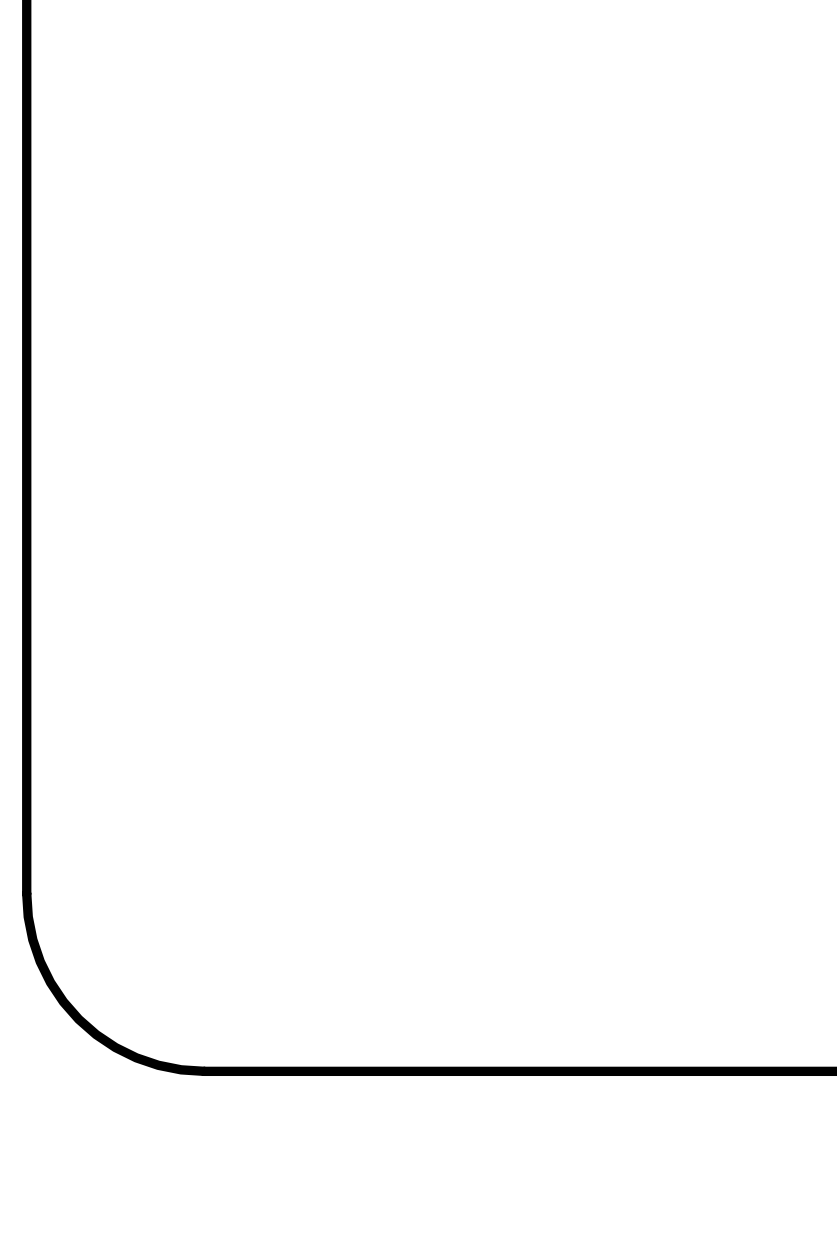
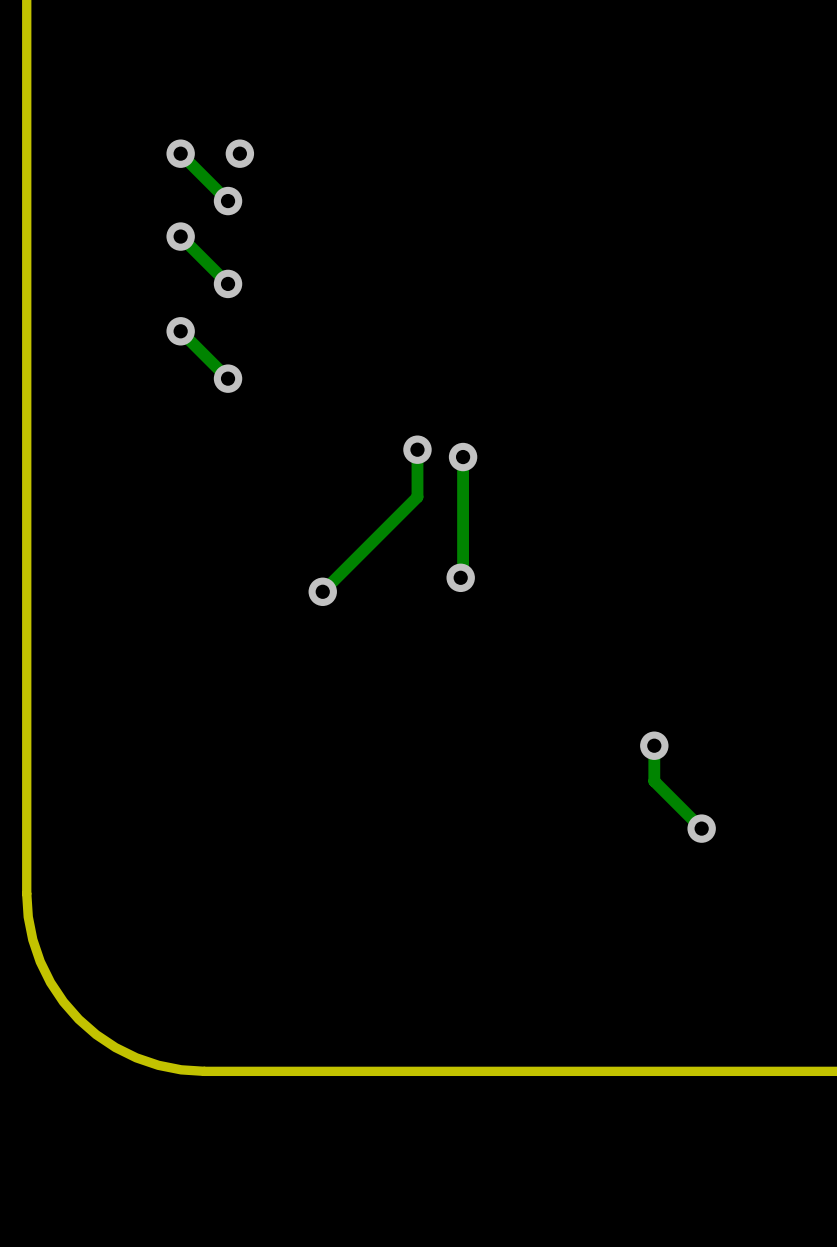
track: none -> (180, 153) (228, 201)
via: none -> (180, 153)
via: none -> (239, 153)
via: none -> (228, 201)
track: none -> (180, 236) (228, 283)
via: none -> (180, 236)
via: none -> (228, 283)
track: none -> (180, 331) (228, 378)
via: none -> (180, 331)
via: none -> (228, 378)
track: none -> (417, 449) (417, 497) (322, 591)
via: none -> (417, 449)
track: none -> (463, 457) (463, 575) (460, 577)
via: none -> (463, 457)
via: none -> (460, 577)
via: none -> (322, 591)
track: none -> (654, 745) (654, 781) (701, 828)
via: none -> (654, 745)
via: none -> (701, 828)

